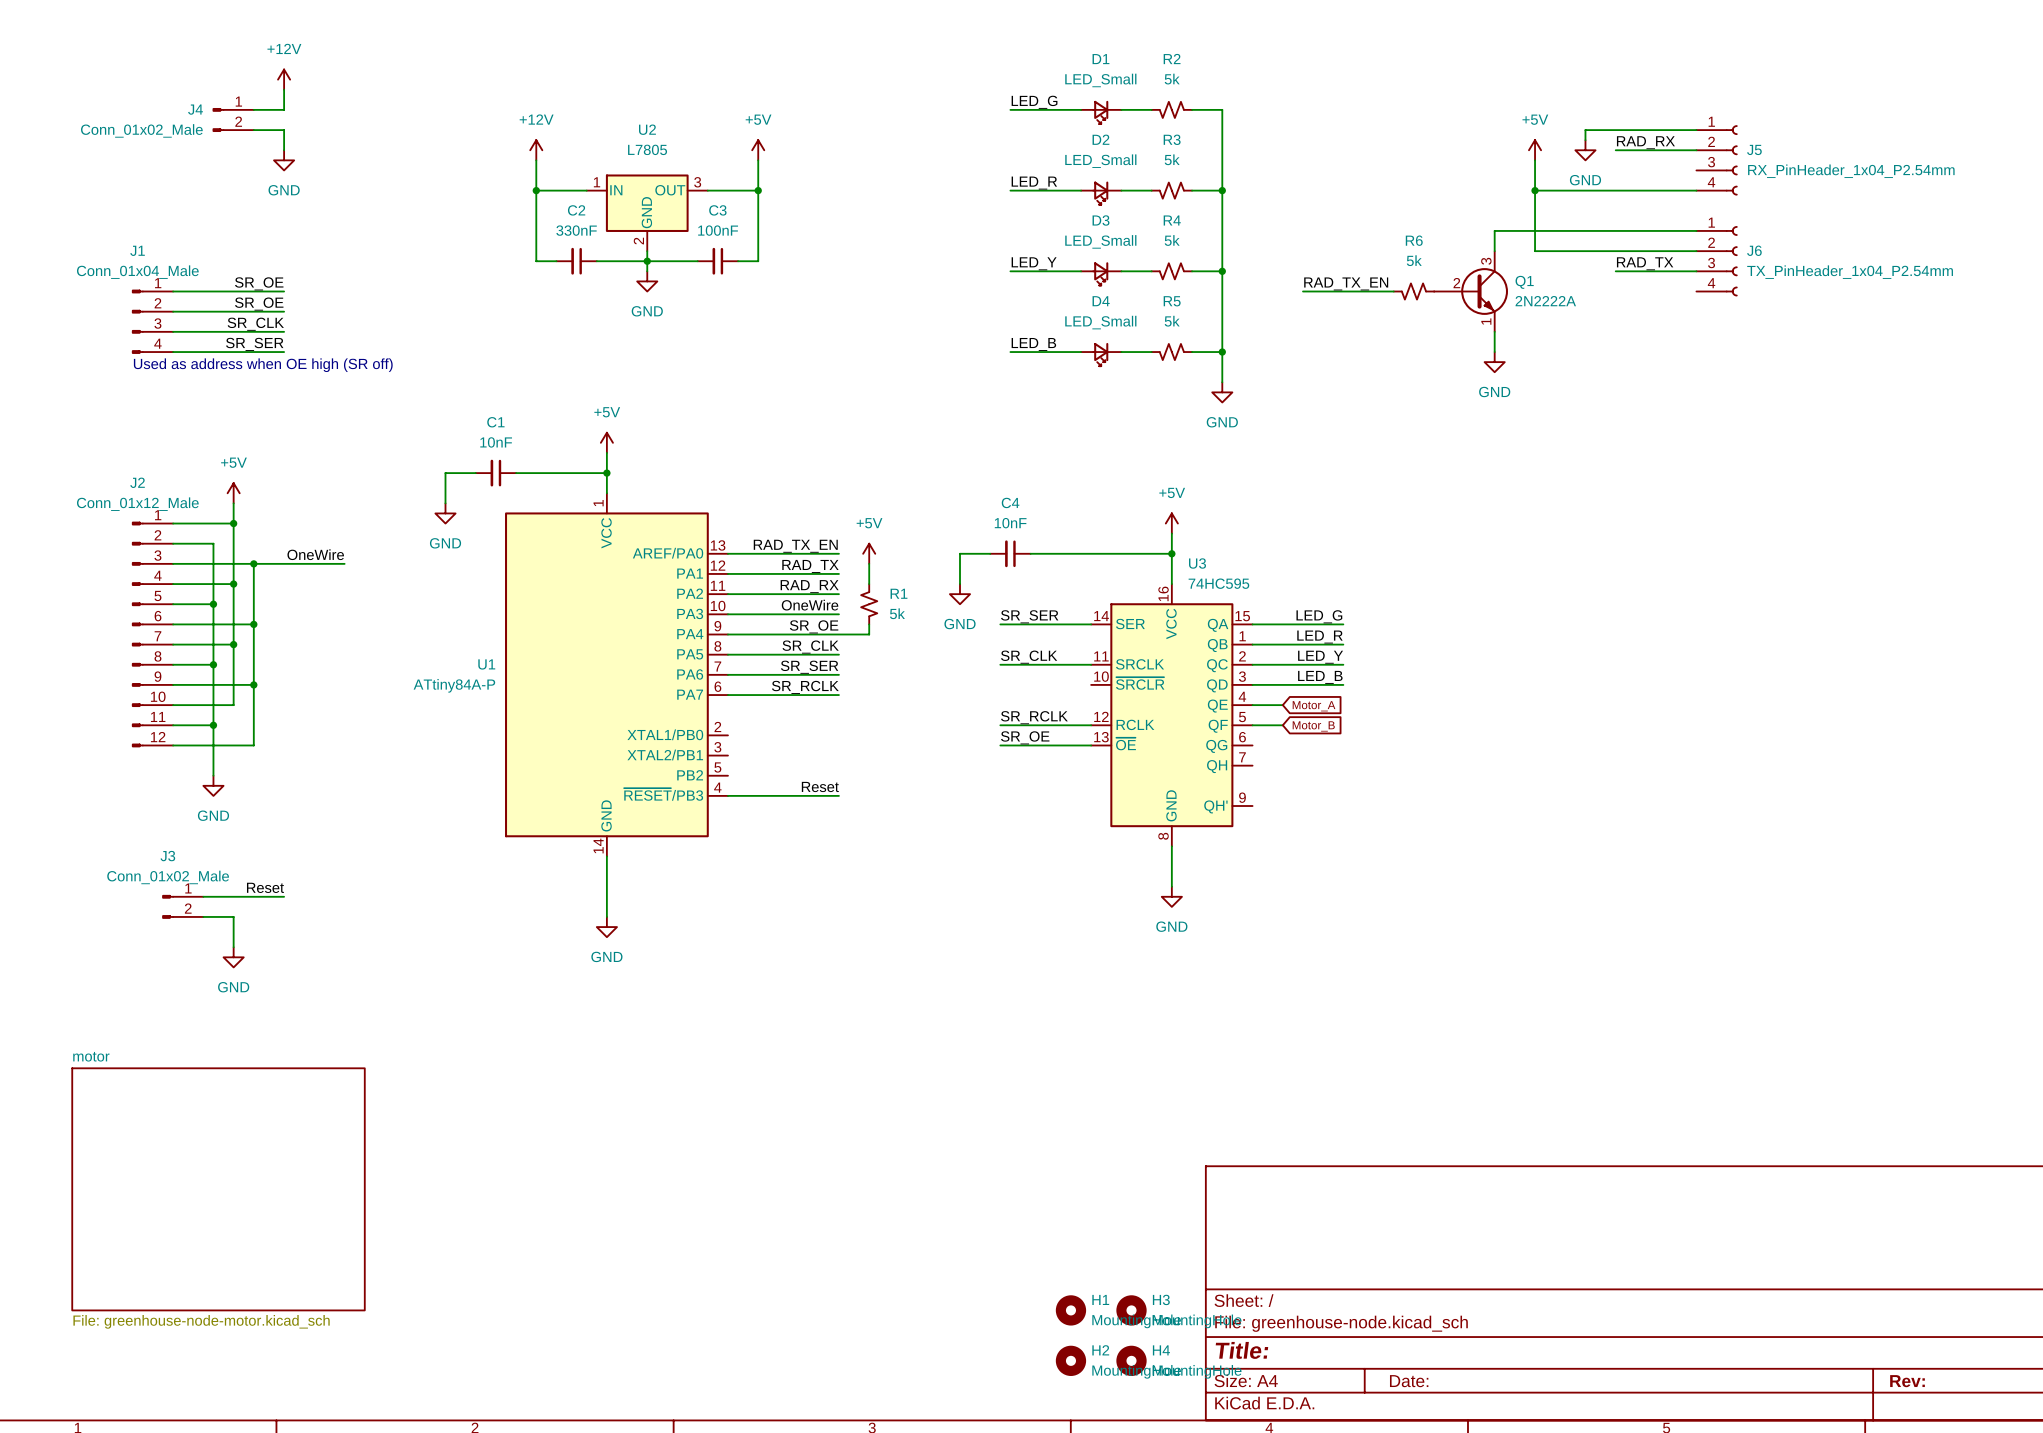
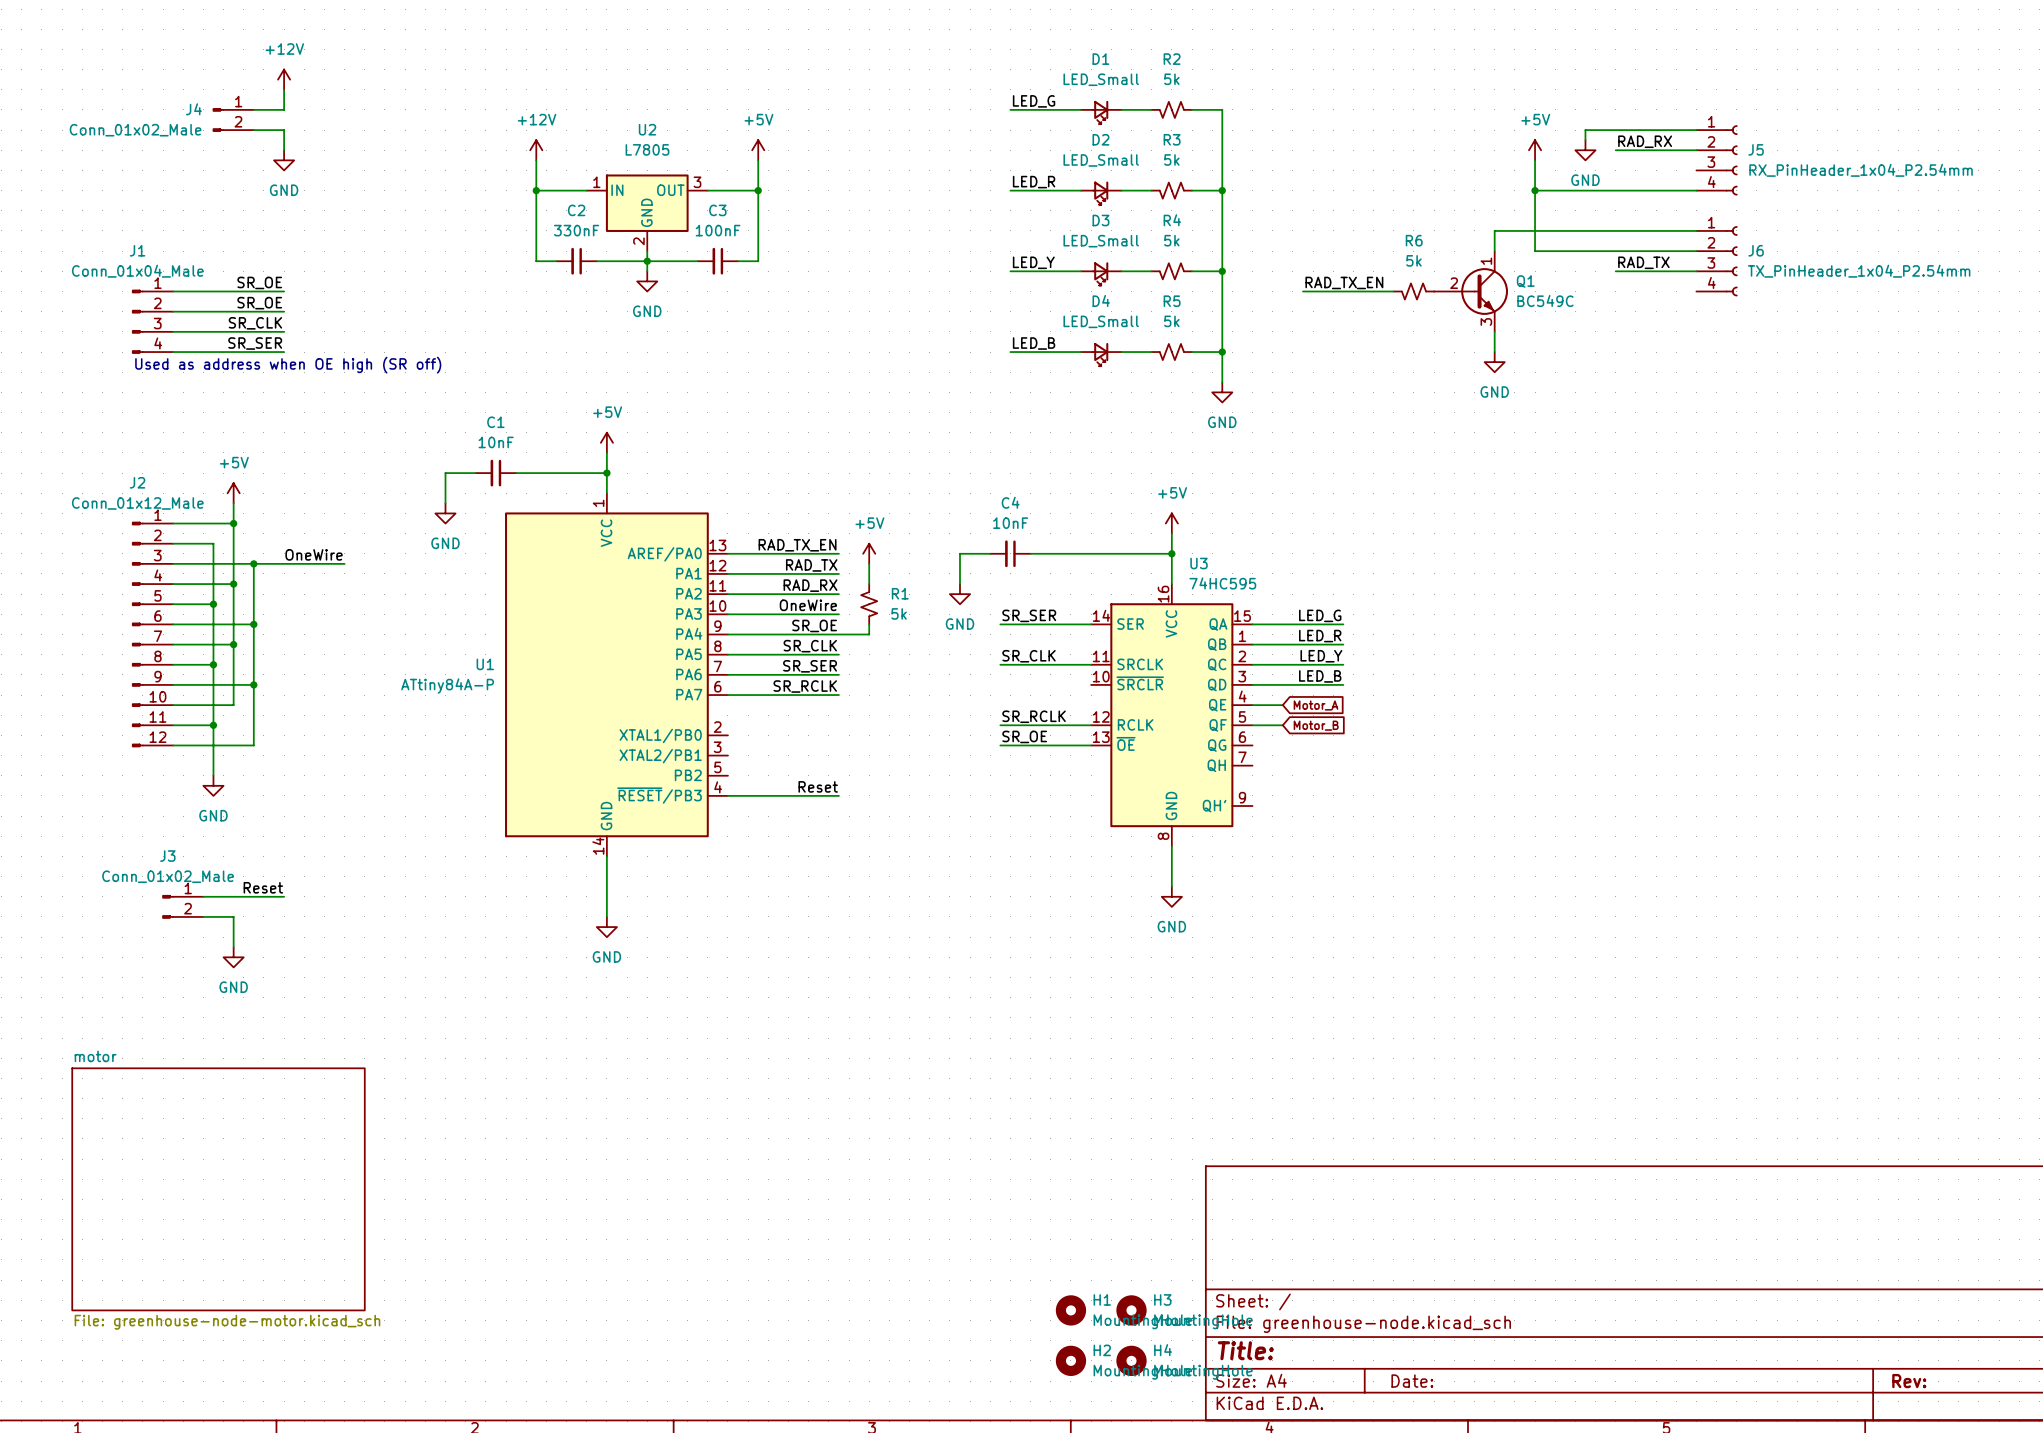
Q1 symbol: [1434, 251, 1508, 332] -> [1434, 251, 1508, 332]
Q1 value: 2N2222A (1545, 301) -> BC549C (1545, 300)

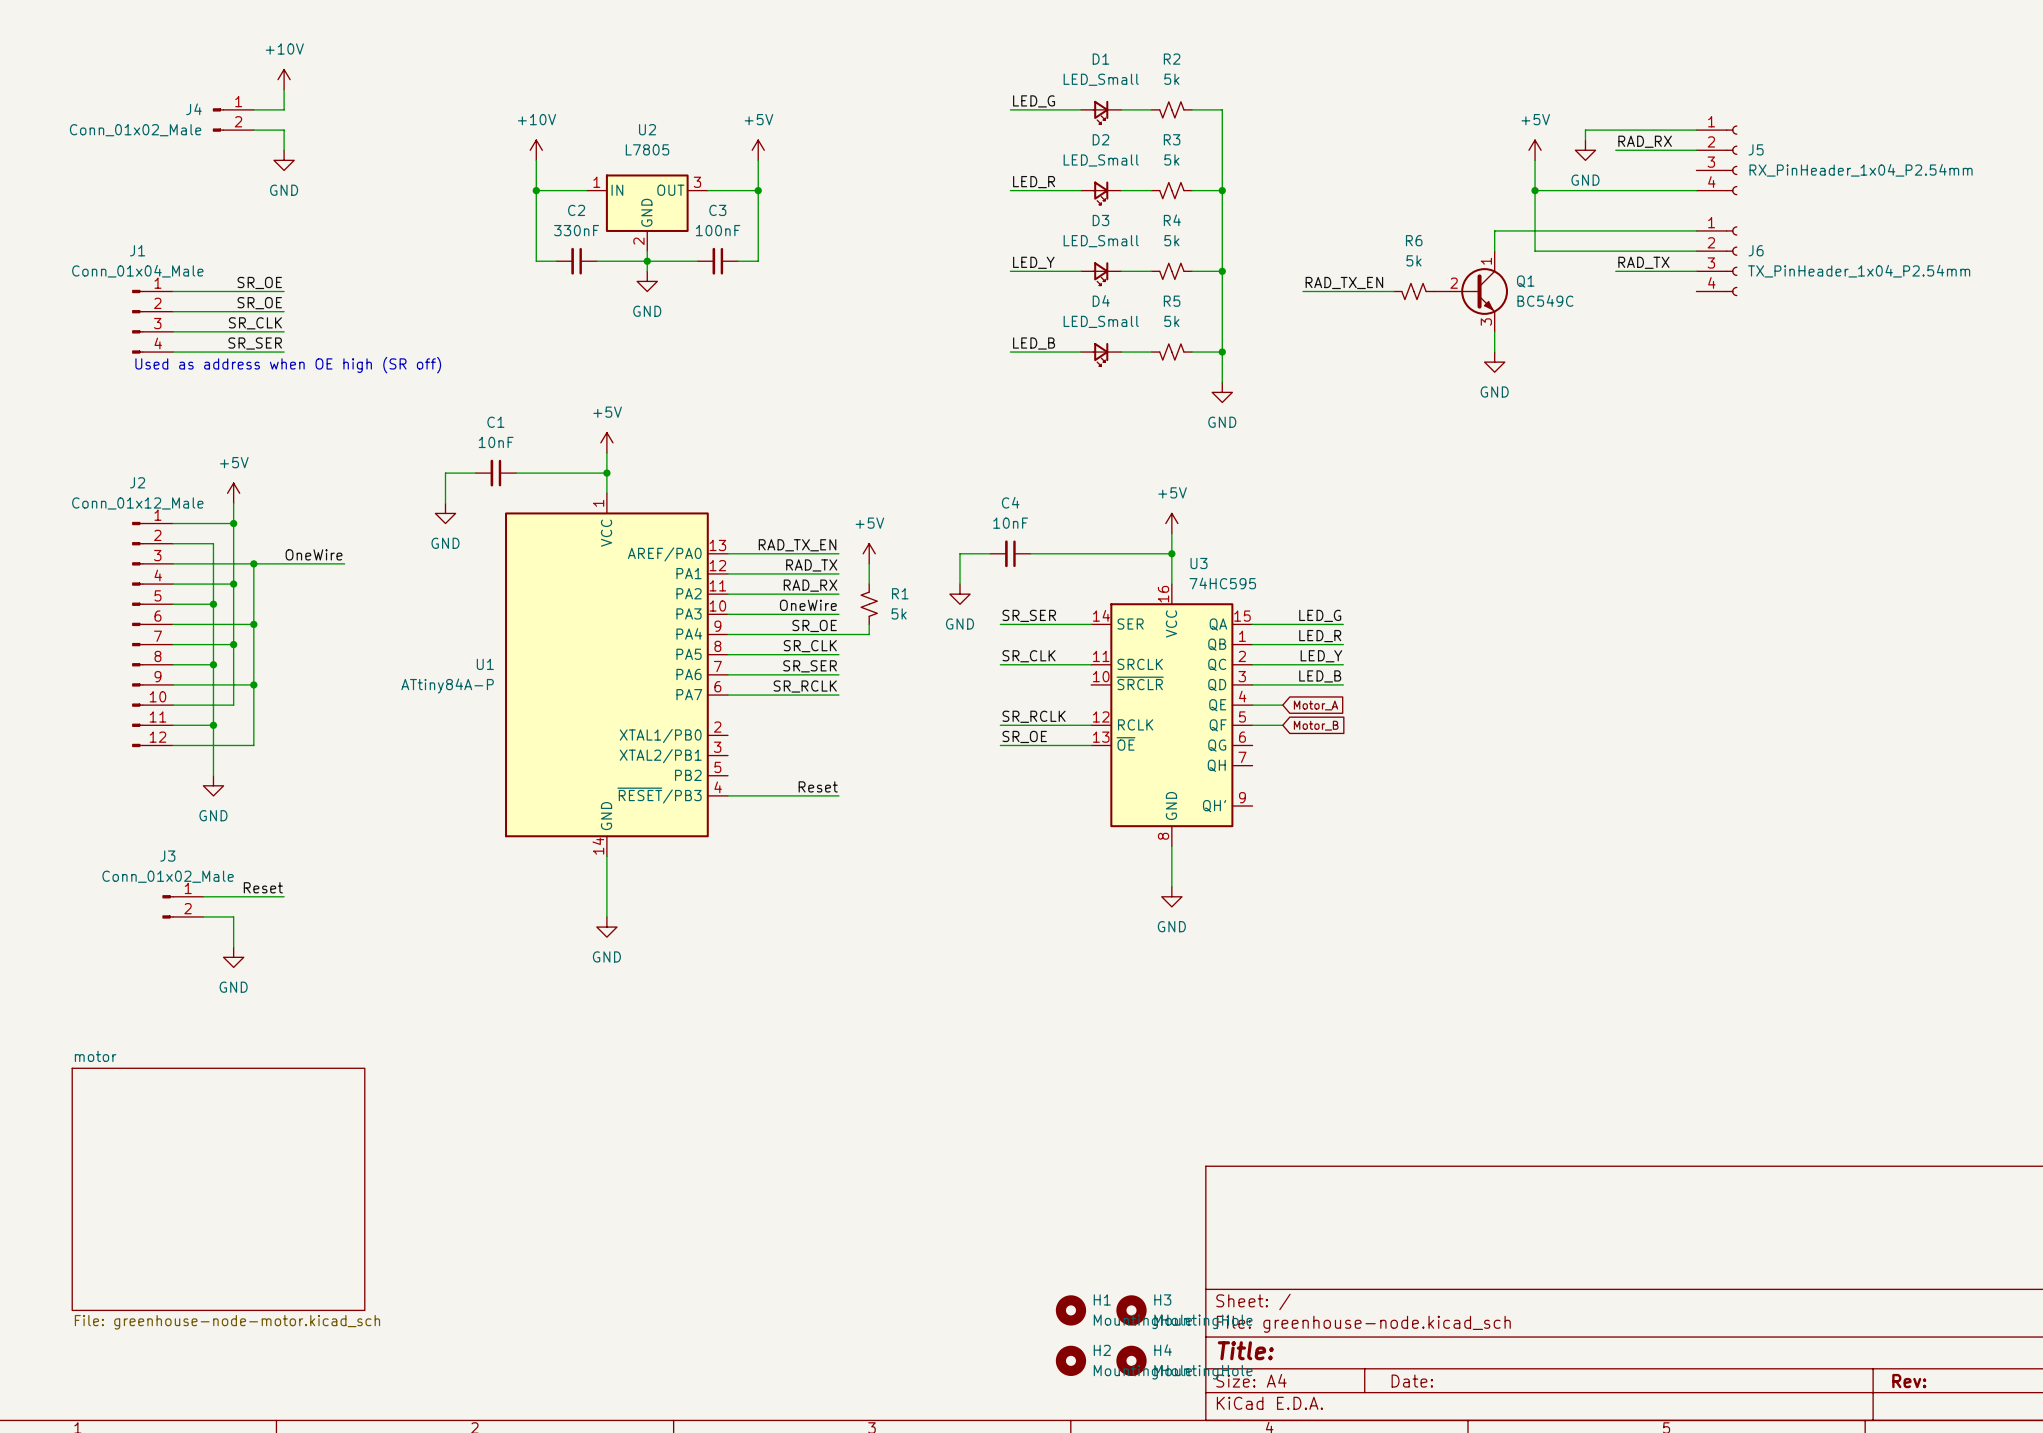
power symbol: +12V (284, 79) -> +10V (284, 79)
power symbol: +12V (536, 150) -> +10V (536, 150)

